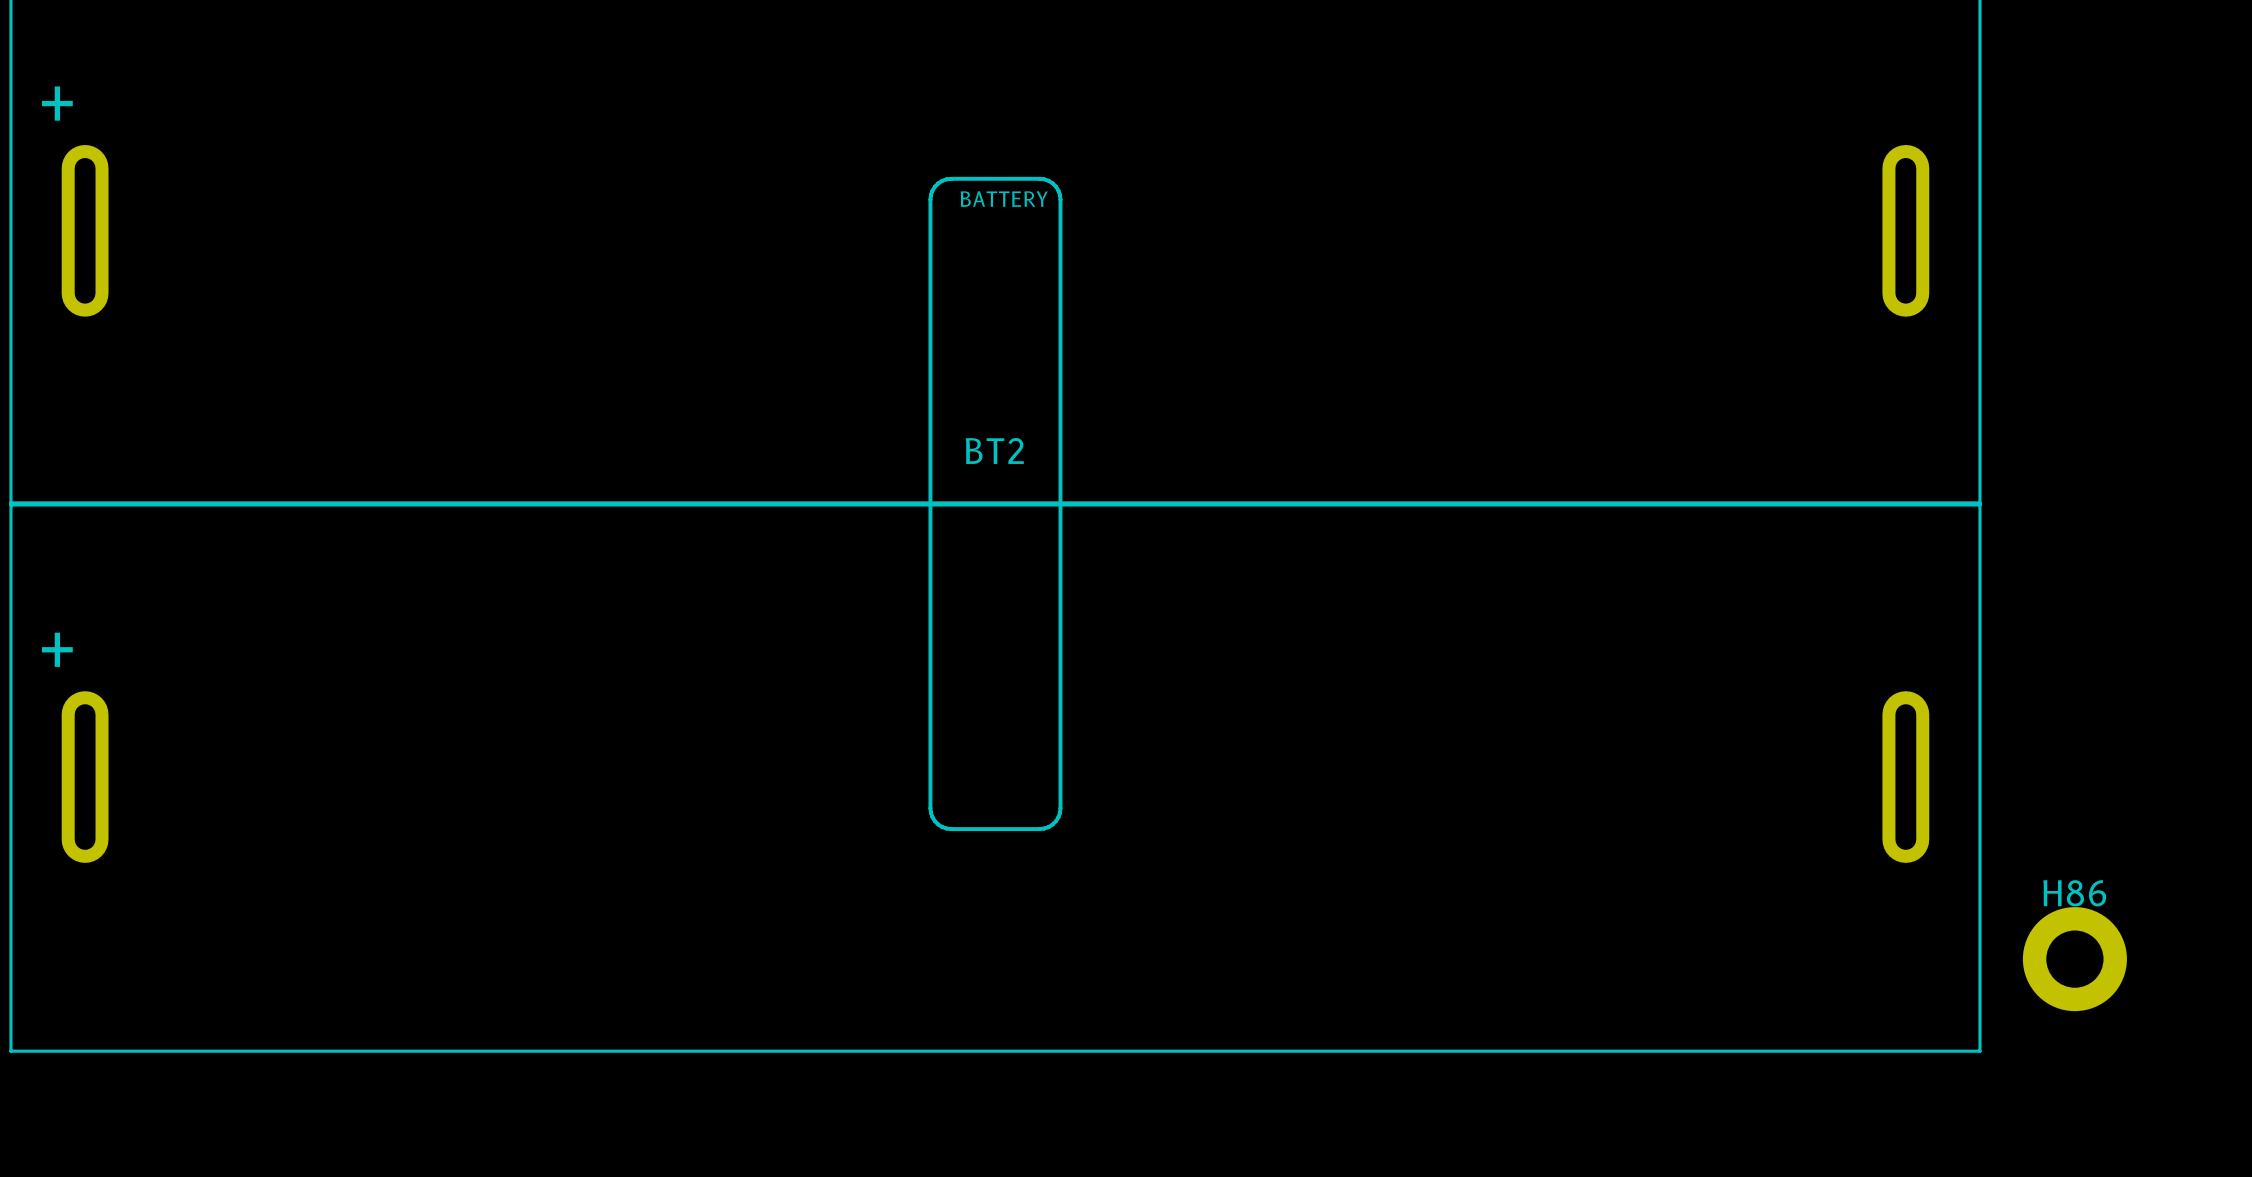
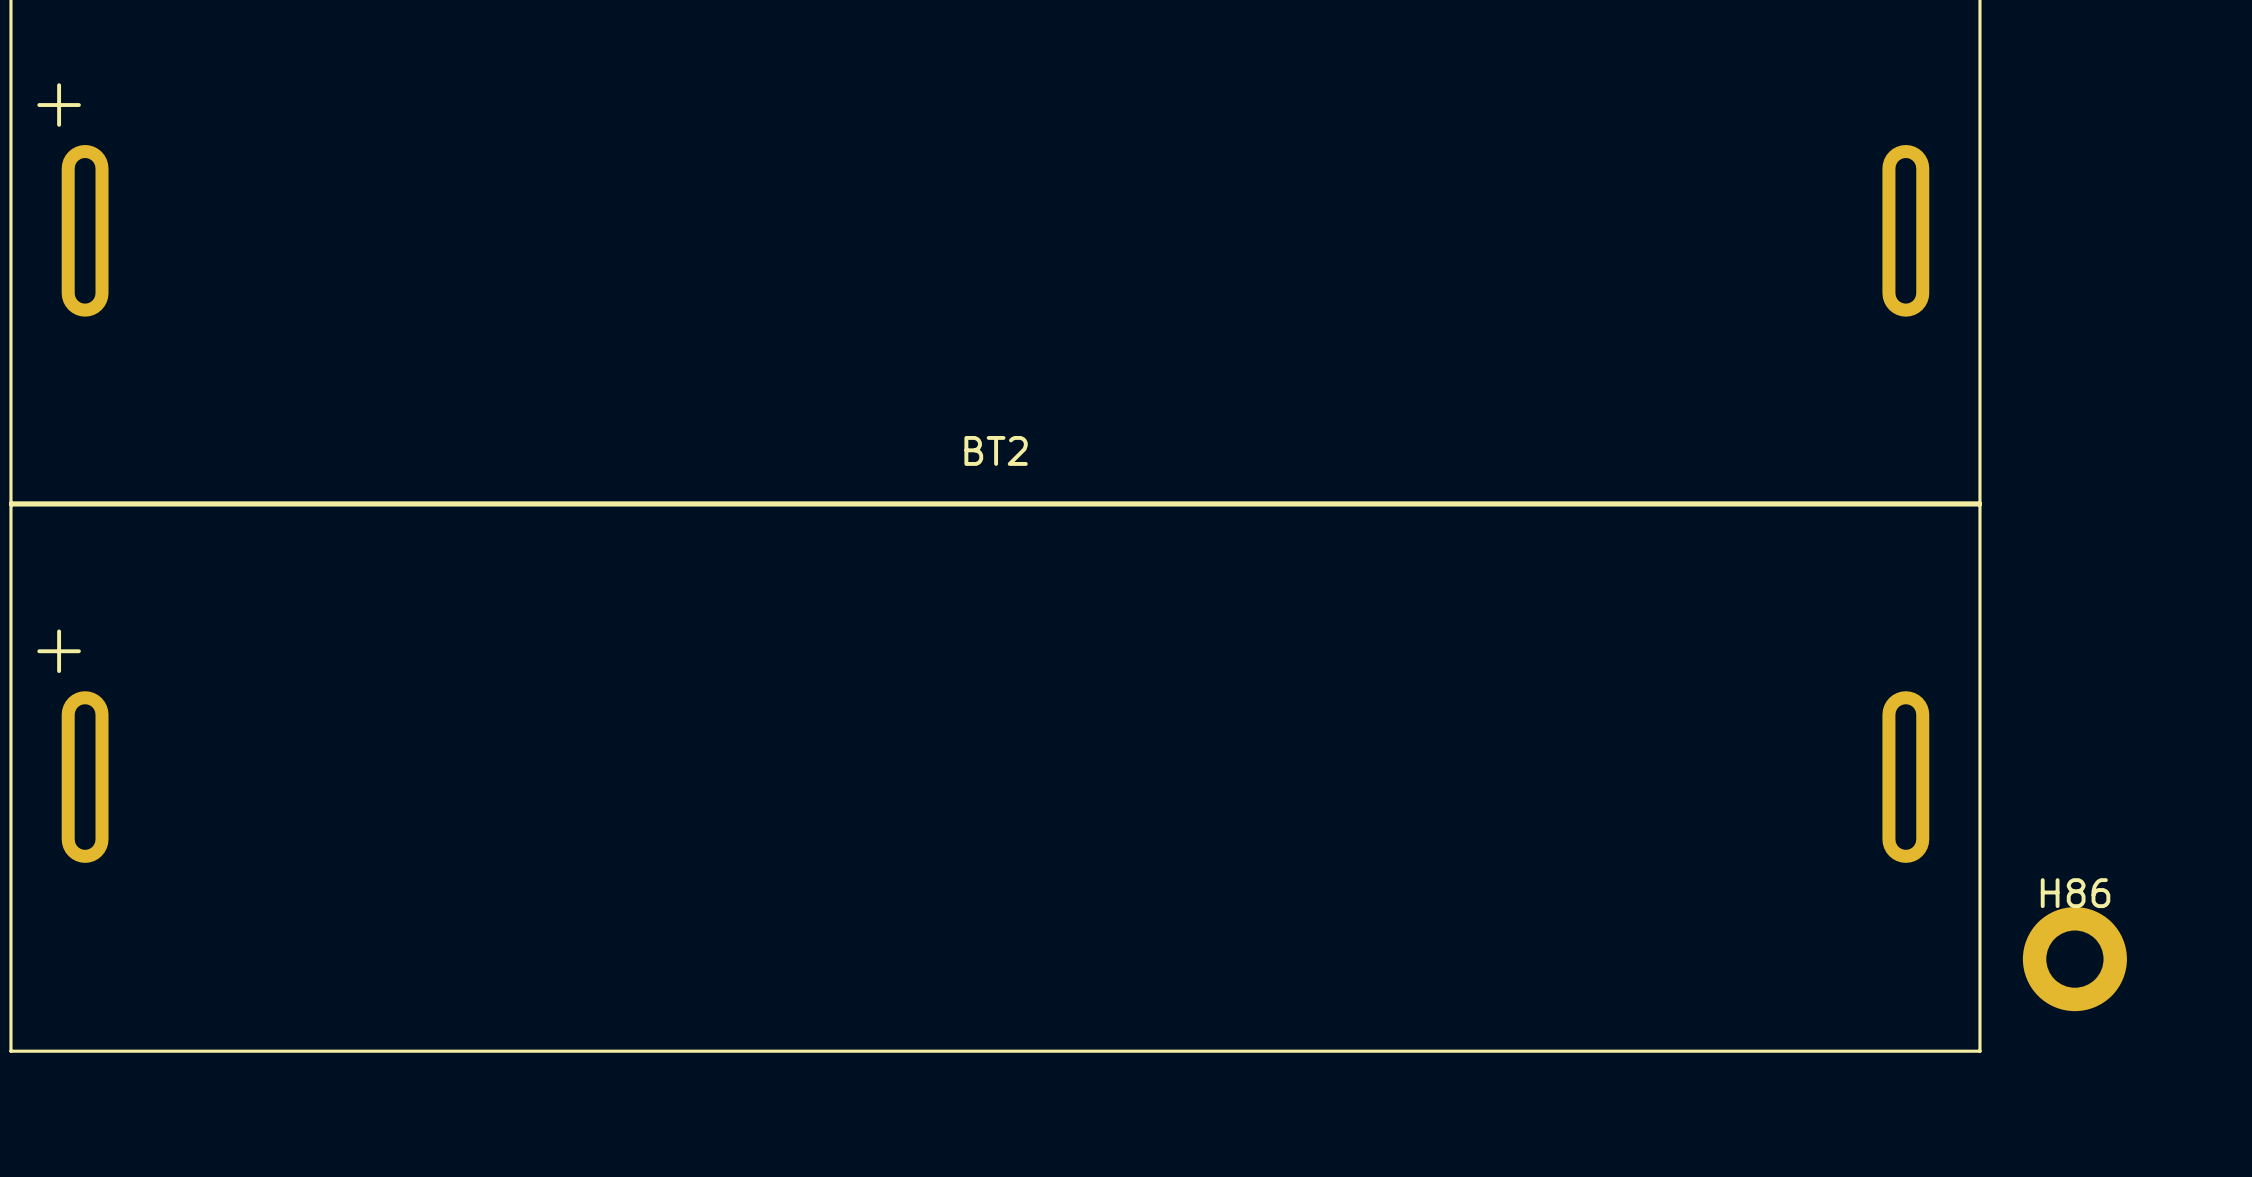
line: (951, 178) (942, 180) (934, 186) (930, 199) (930, 812) (938, 824) (946, 828) (1044, 828) (1055, 821) (1060, 808) (1059, 194) (1055, 186) (1044, 179) (951, 178) -> none
text: BATTERY (1004, 199) -> none

